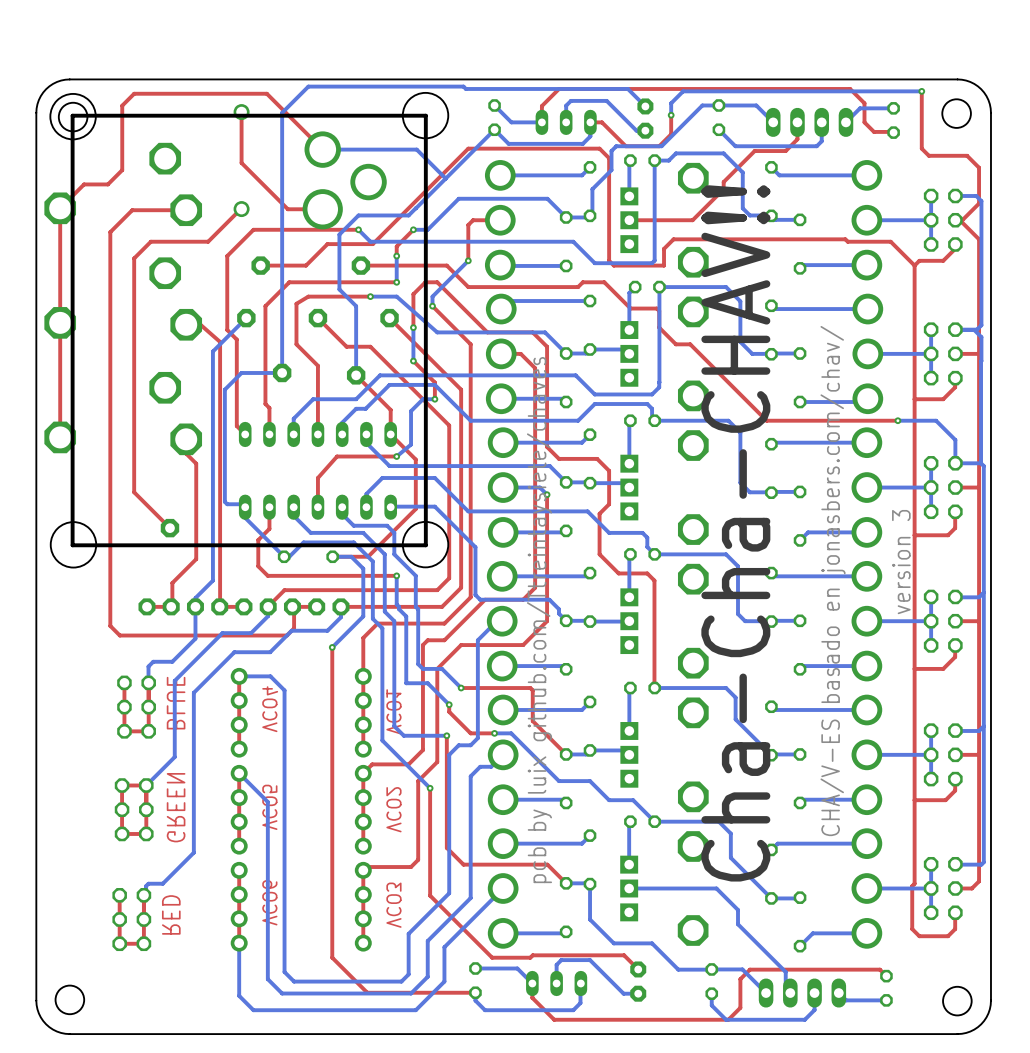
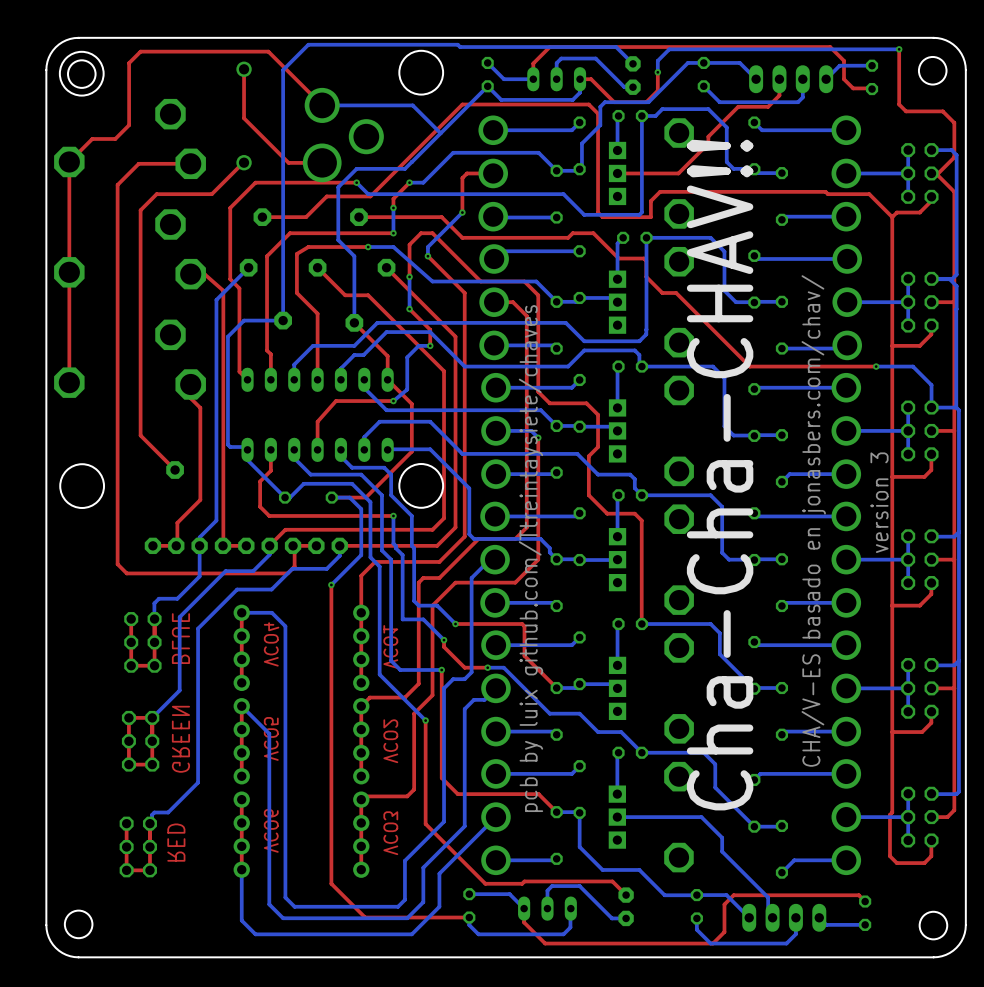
board edge: (425, 115) (72, 115) (72, 545) (425, 545) (425, 115) -> none

